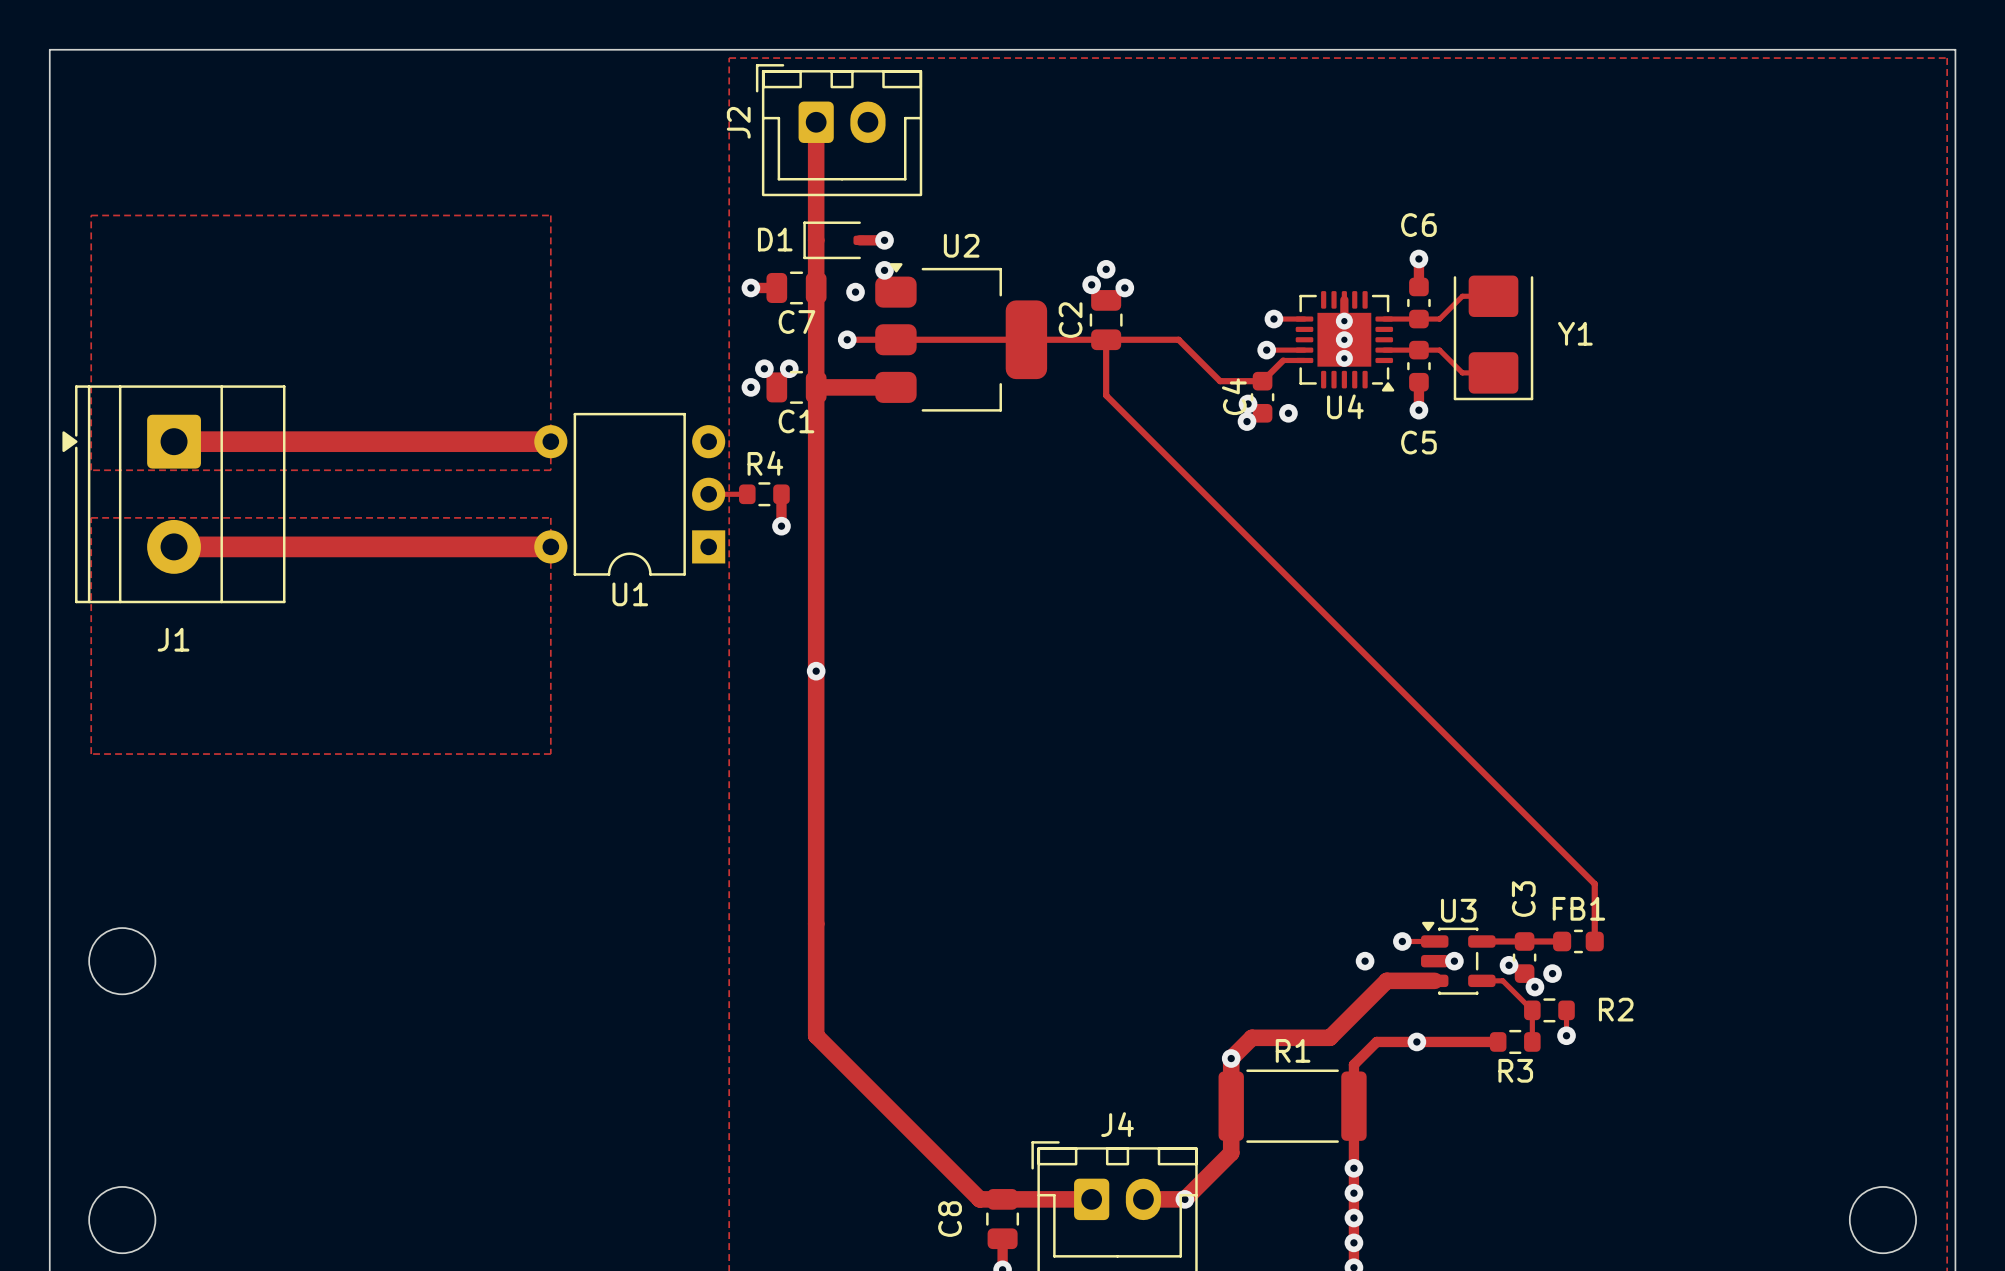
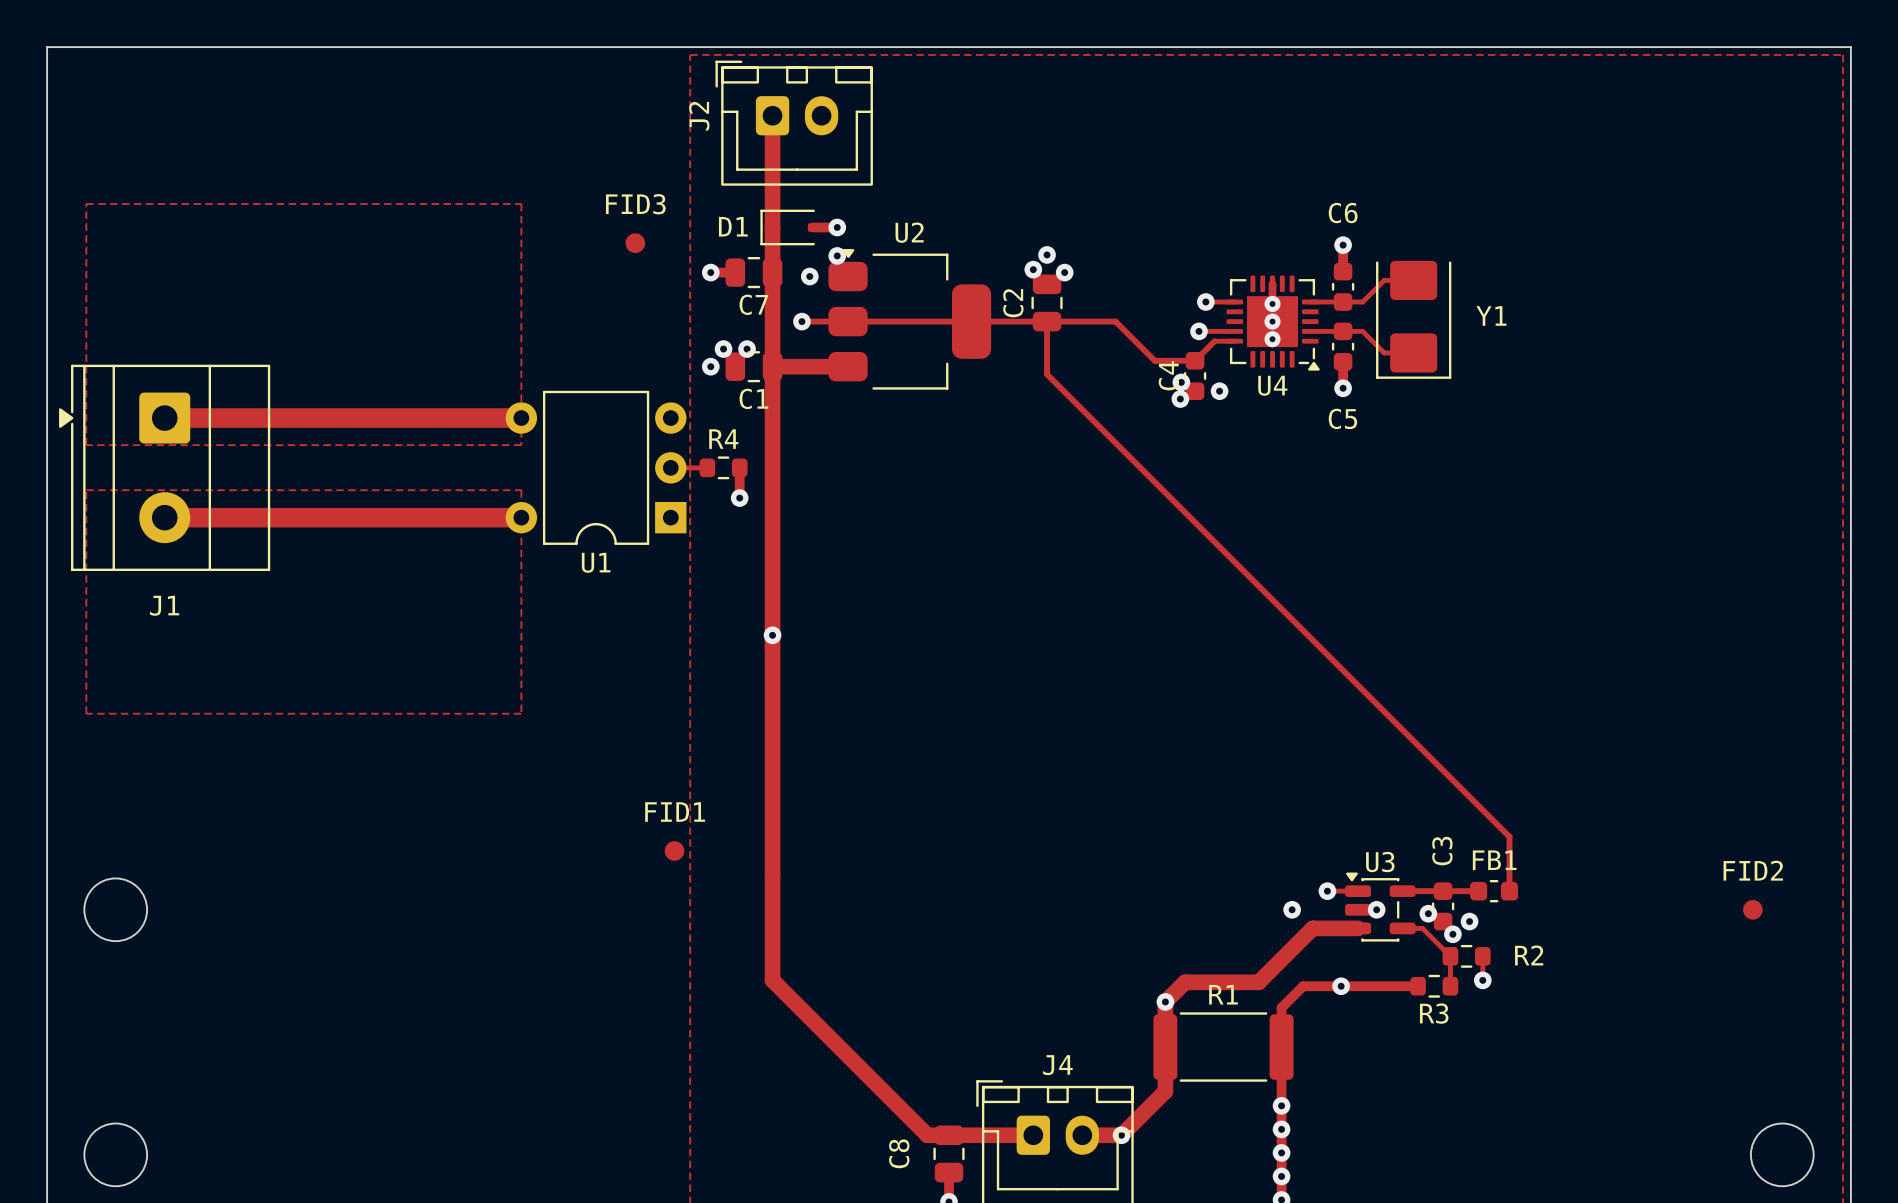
FID3: none -> (635, 243)
FID1: none -> (674, 850)
FID2: none -> (1752, 909)

